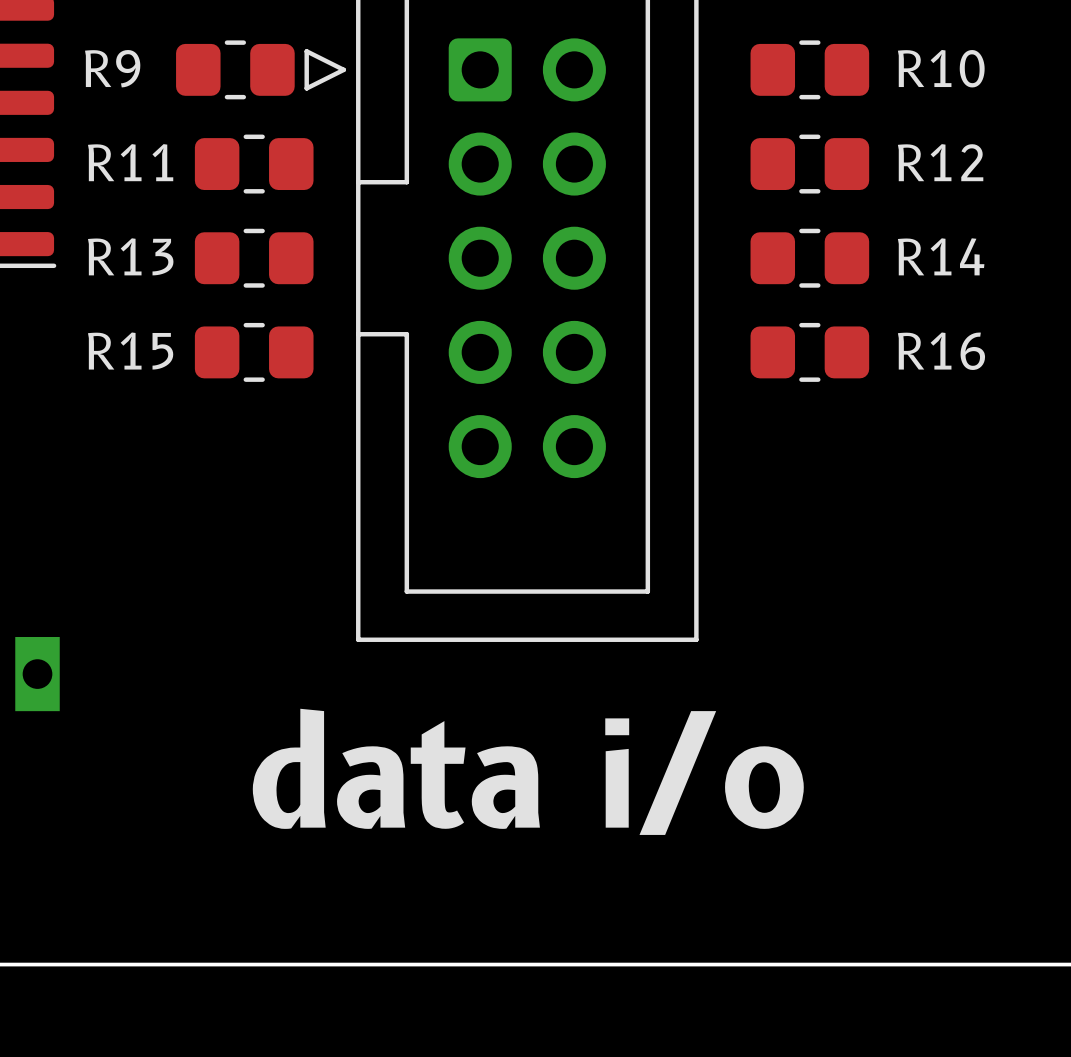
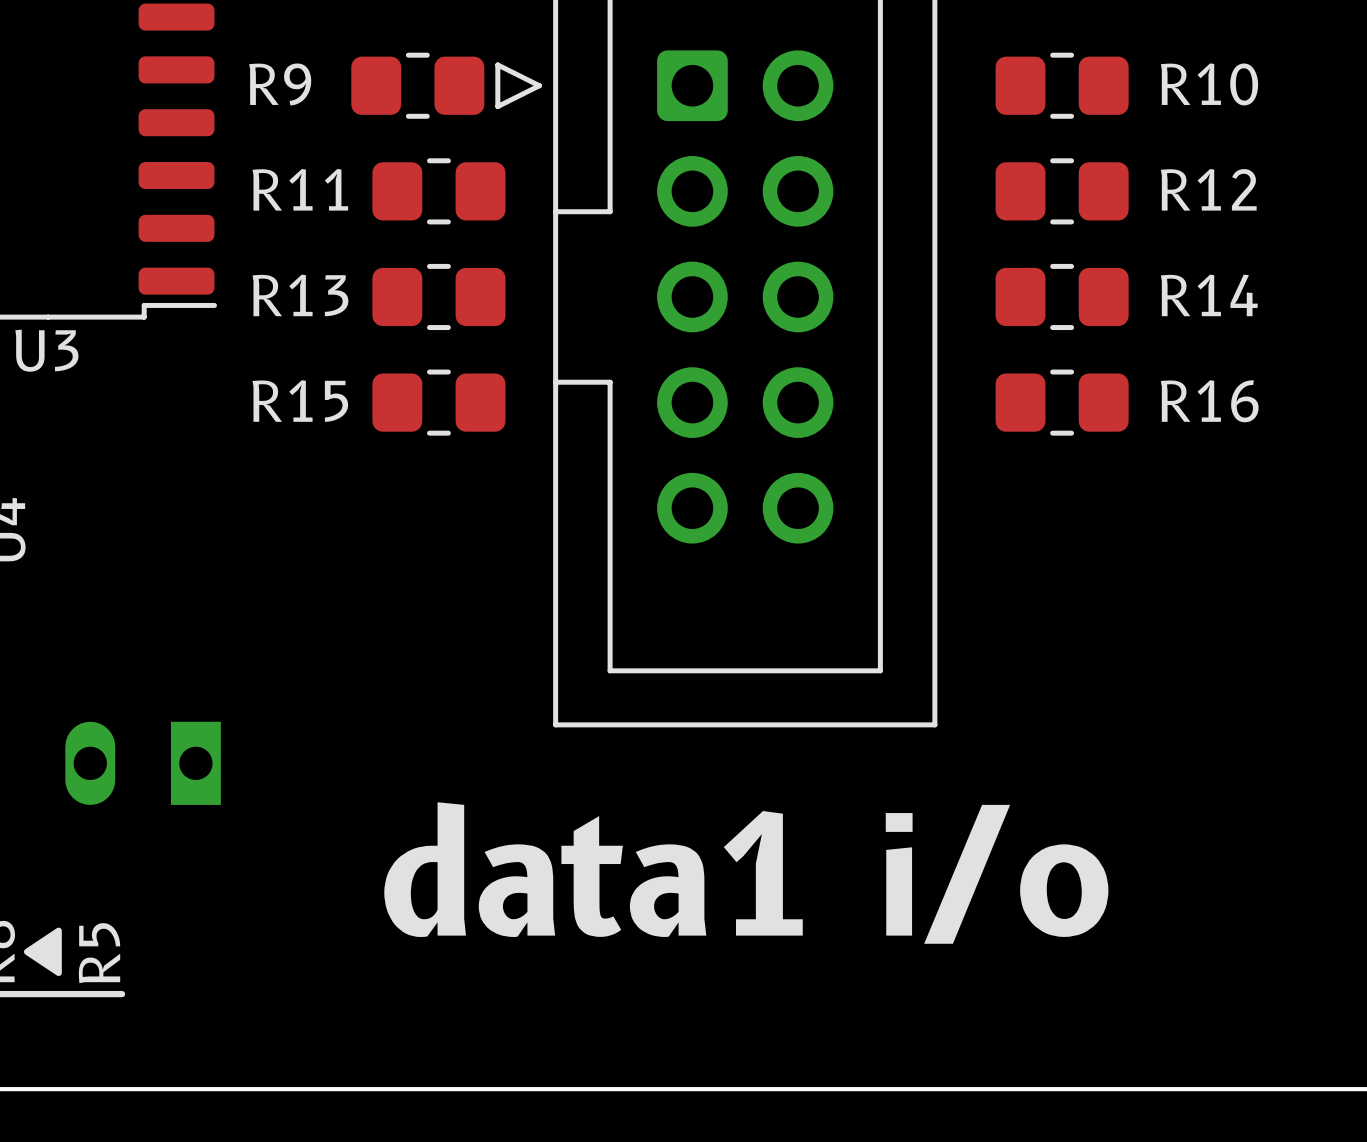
text: data i/o (528, 771) -> data1 i/o (746, 873)

